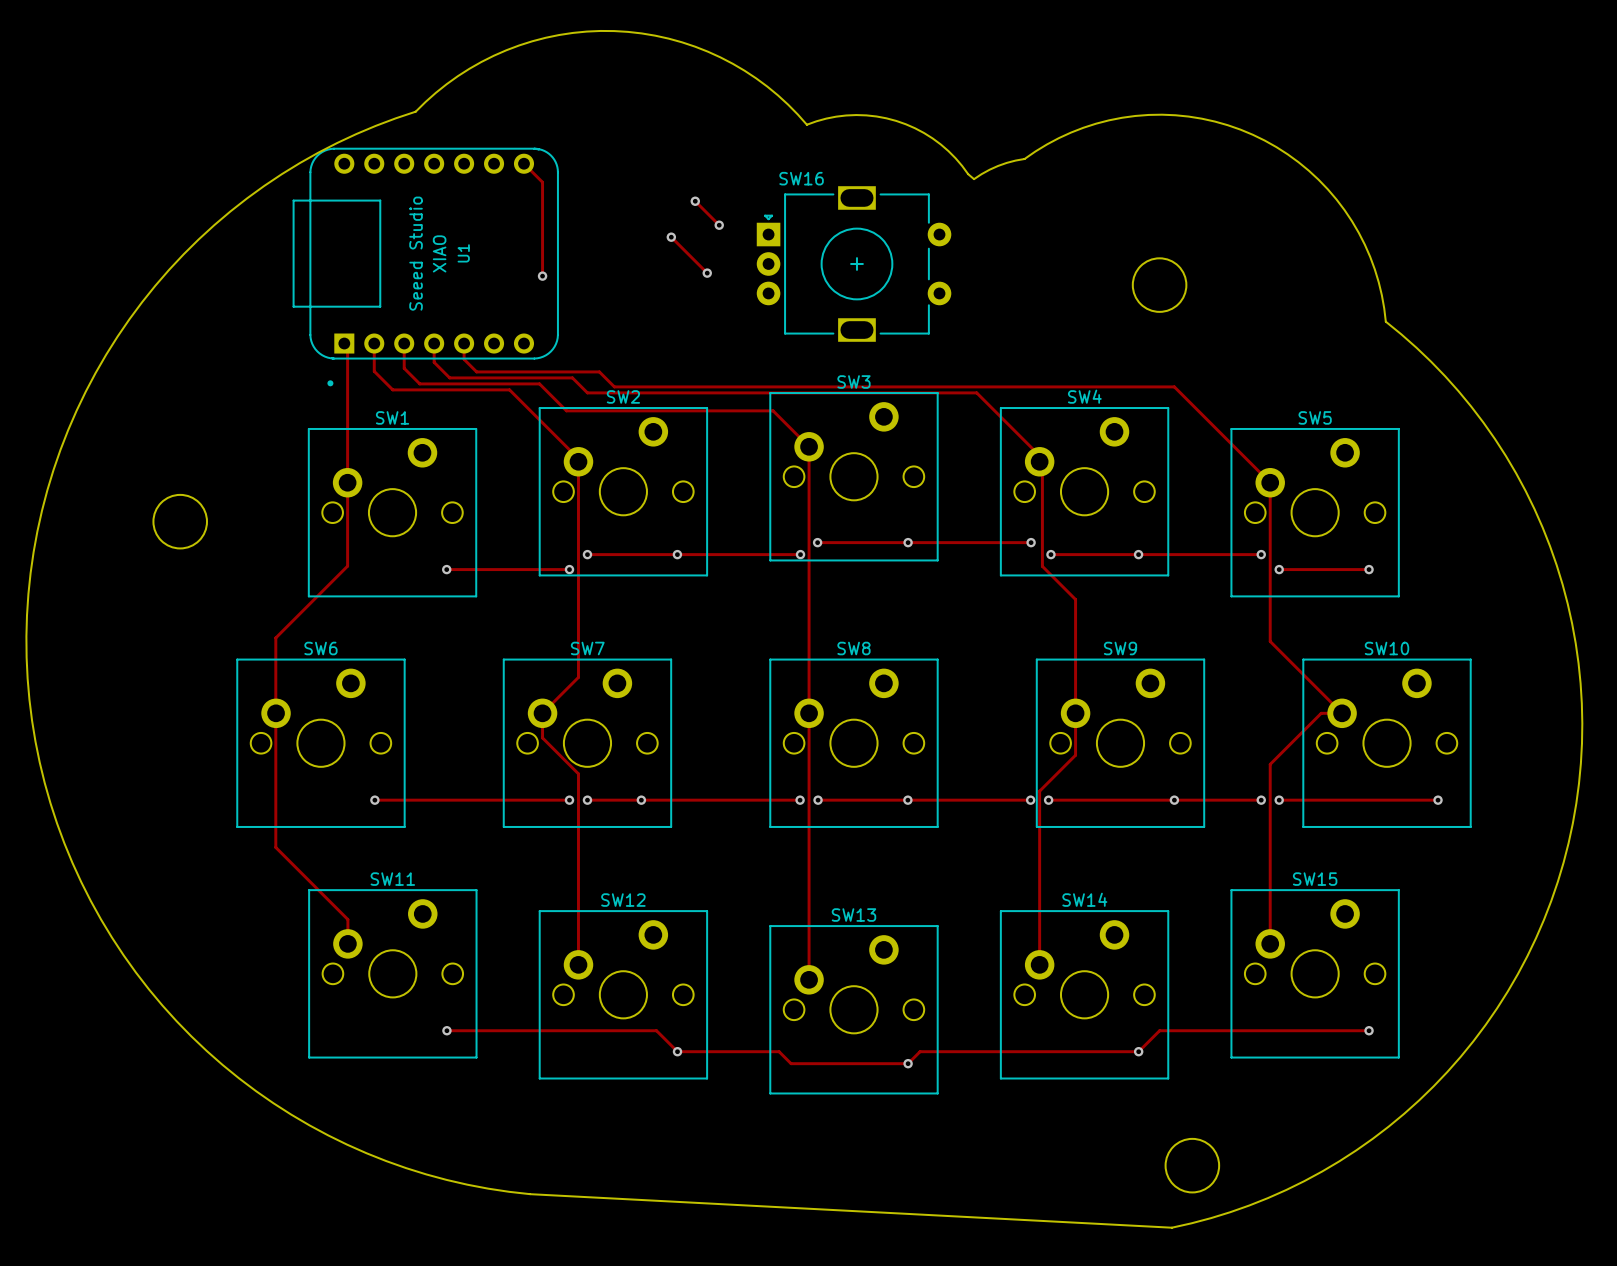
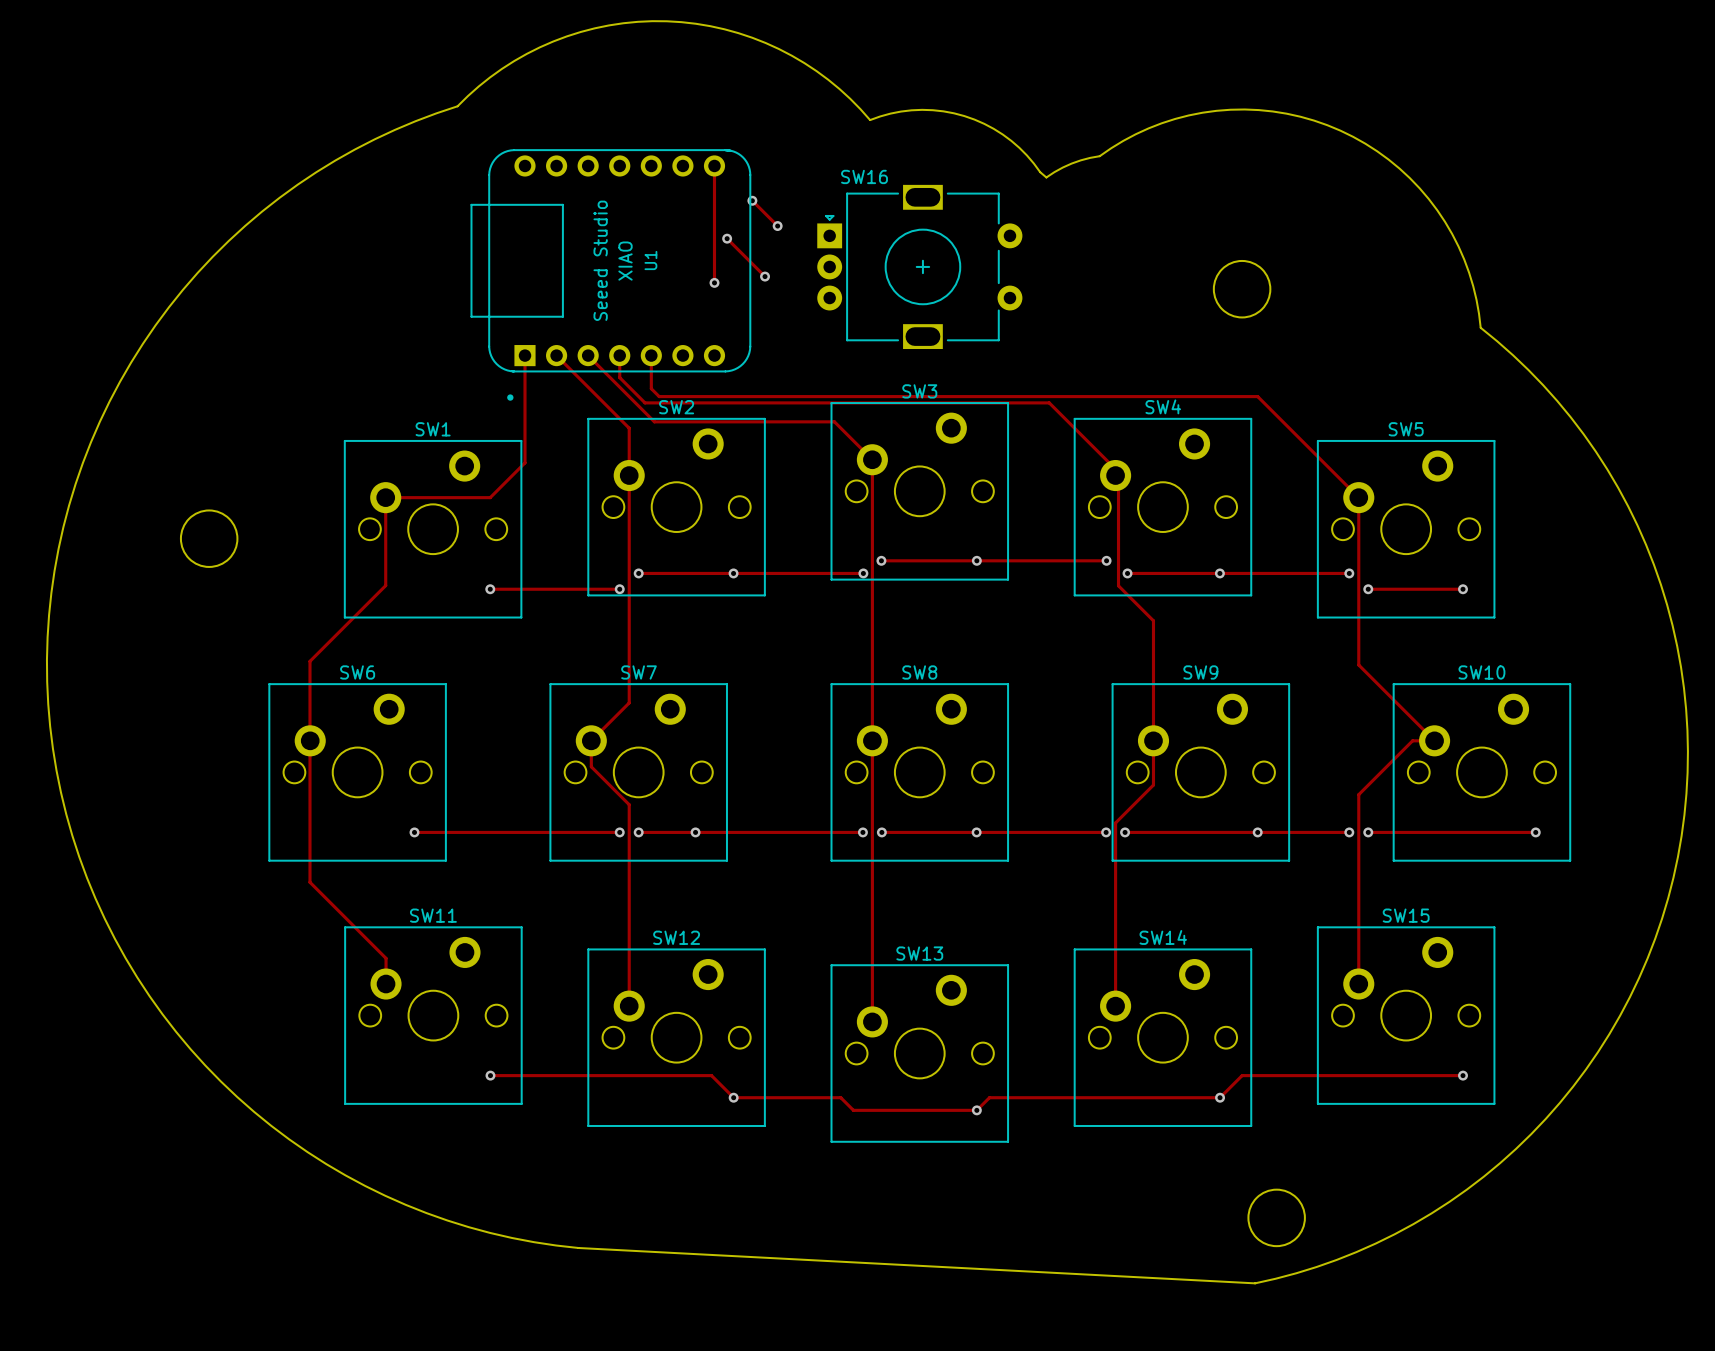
track: (523, 163) (542, 182) (542, 276) -> none
track: none -> (714, 165) (714, 282)
U1 position: (425, 267) -> (610, 275)
via: (542, 276) -> none
via: none -> (714, 282)
track: (344, 343) (347, 346) (347, 482) -> (525, 355) (525, 462) (490, 497) (385, 497)
track: (374, 343) (374, 371) (392, 389) (509, 389) (578, 458) -> (556, 355) (629, 428) (629, 472)
track: (404, 343) (404, 368) (419, 383) (539, 383) (566, 410) (602, 410) -> (588, 355) (654, 421)
track: (434, 343) (434, 362) (449, 377) (572, 377) (587, 392) (593, 392) -> (619, 355) (619, 377) (645, 402)
track: (464, 343) (464, 359) (476, 371) (599, 371) (614, 386) -> (651, 355) (651, 388) (659, 396) (667, 396)

